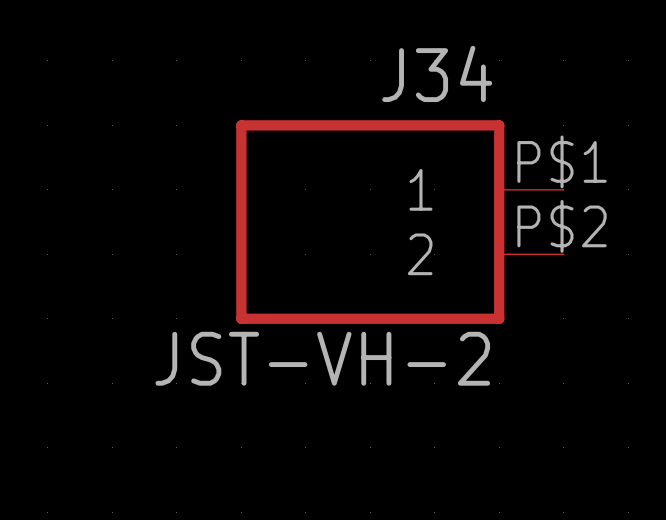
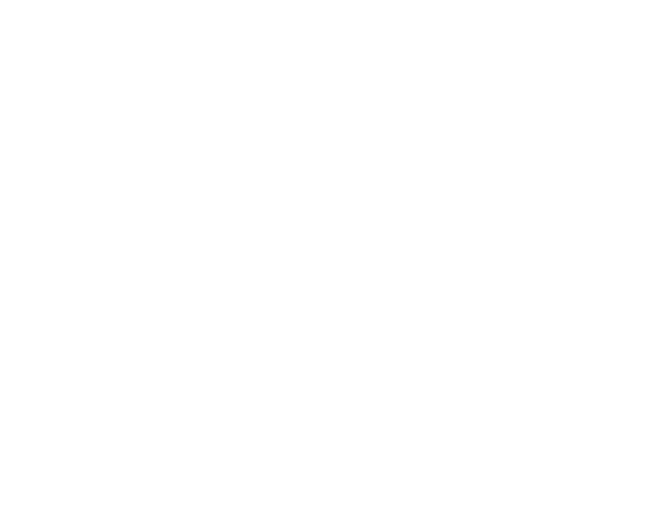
J34: JST-VH-2 (399, 222) -> none

